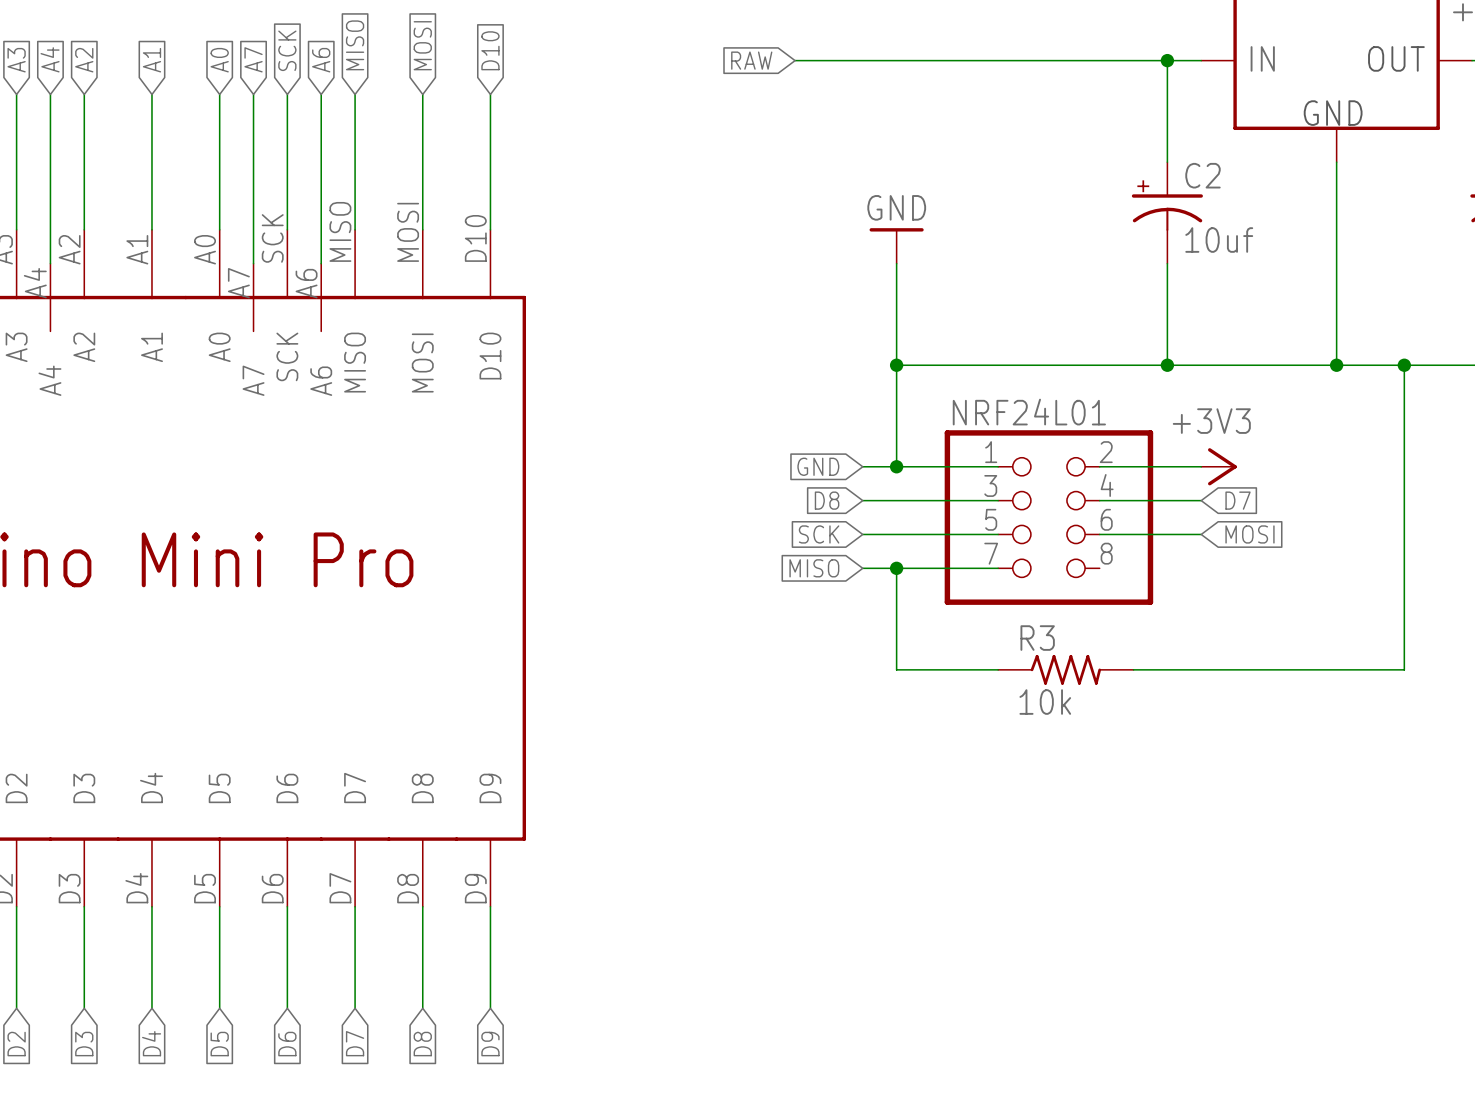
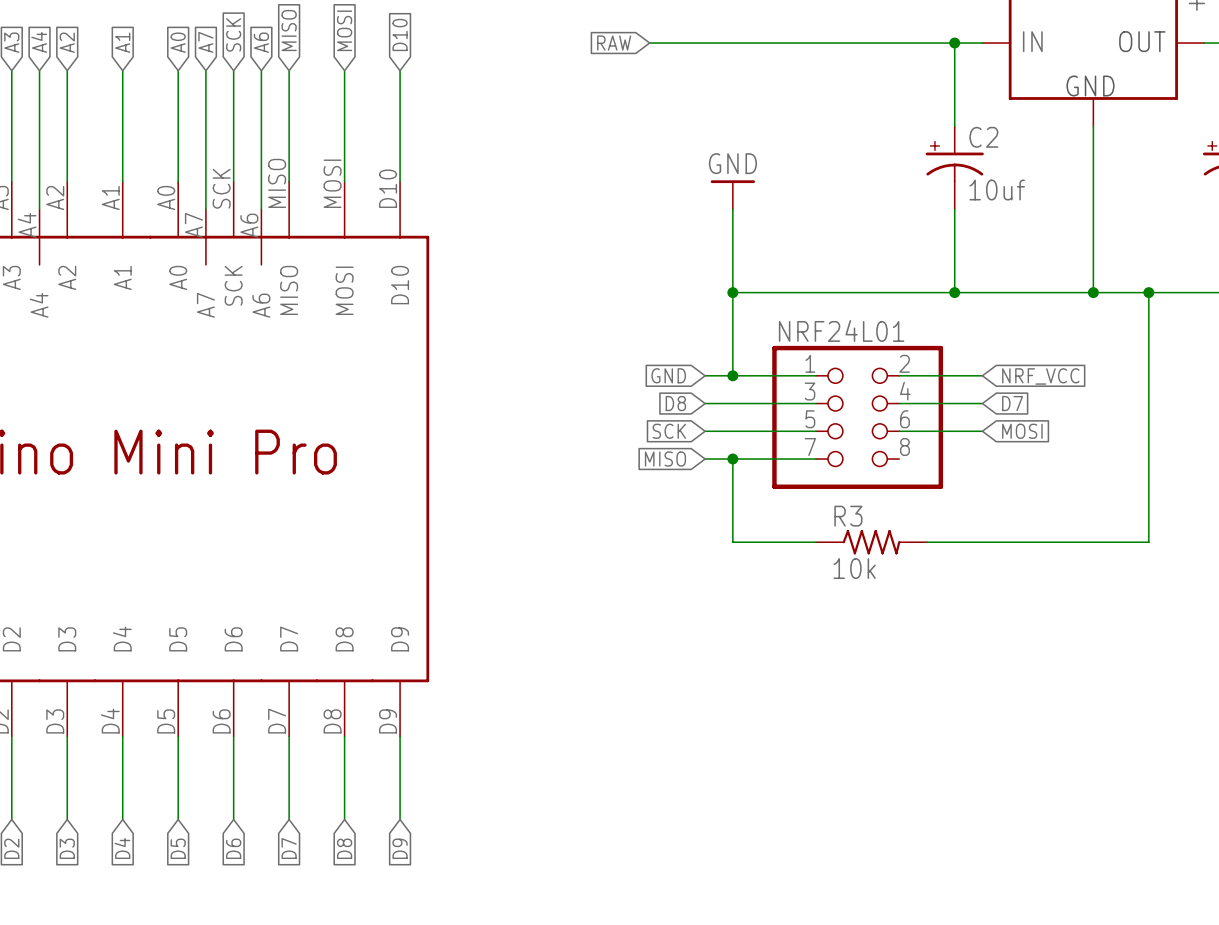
power symbol: +3V3 (1219, 466) -> none
global label: none -> NRF_VCC (1040, 376)

